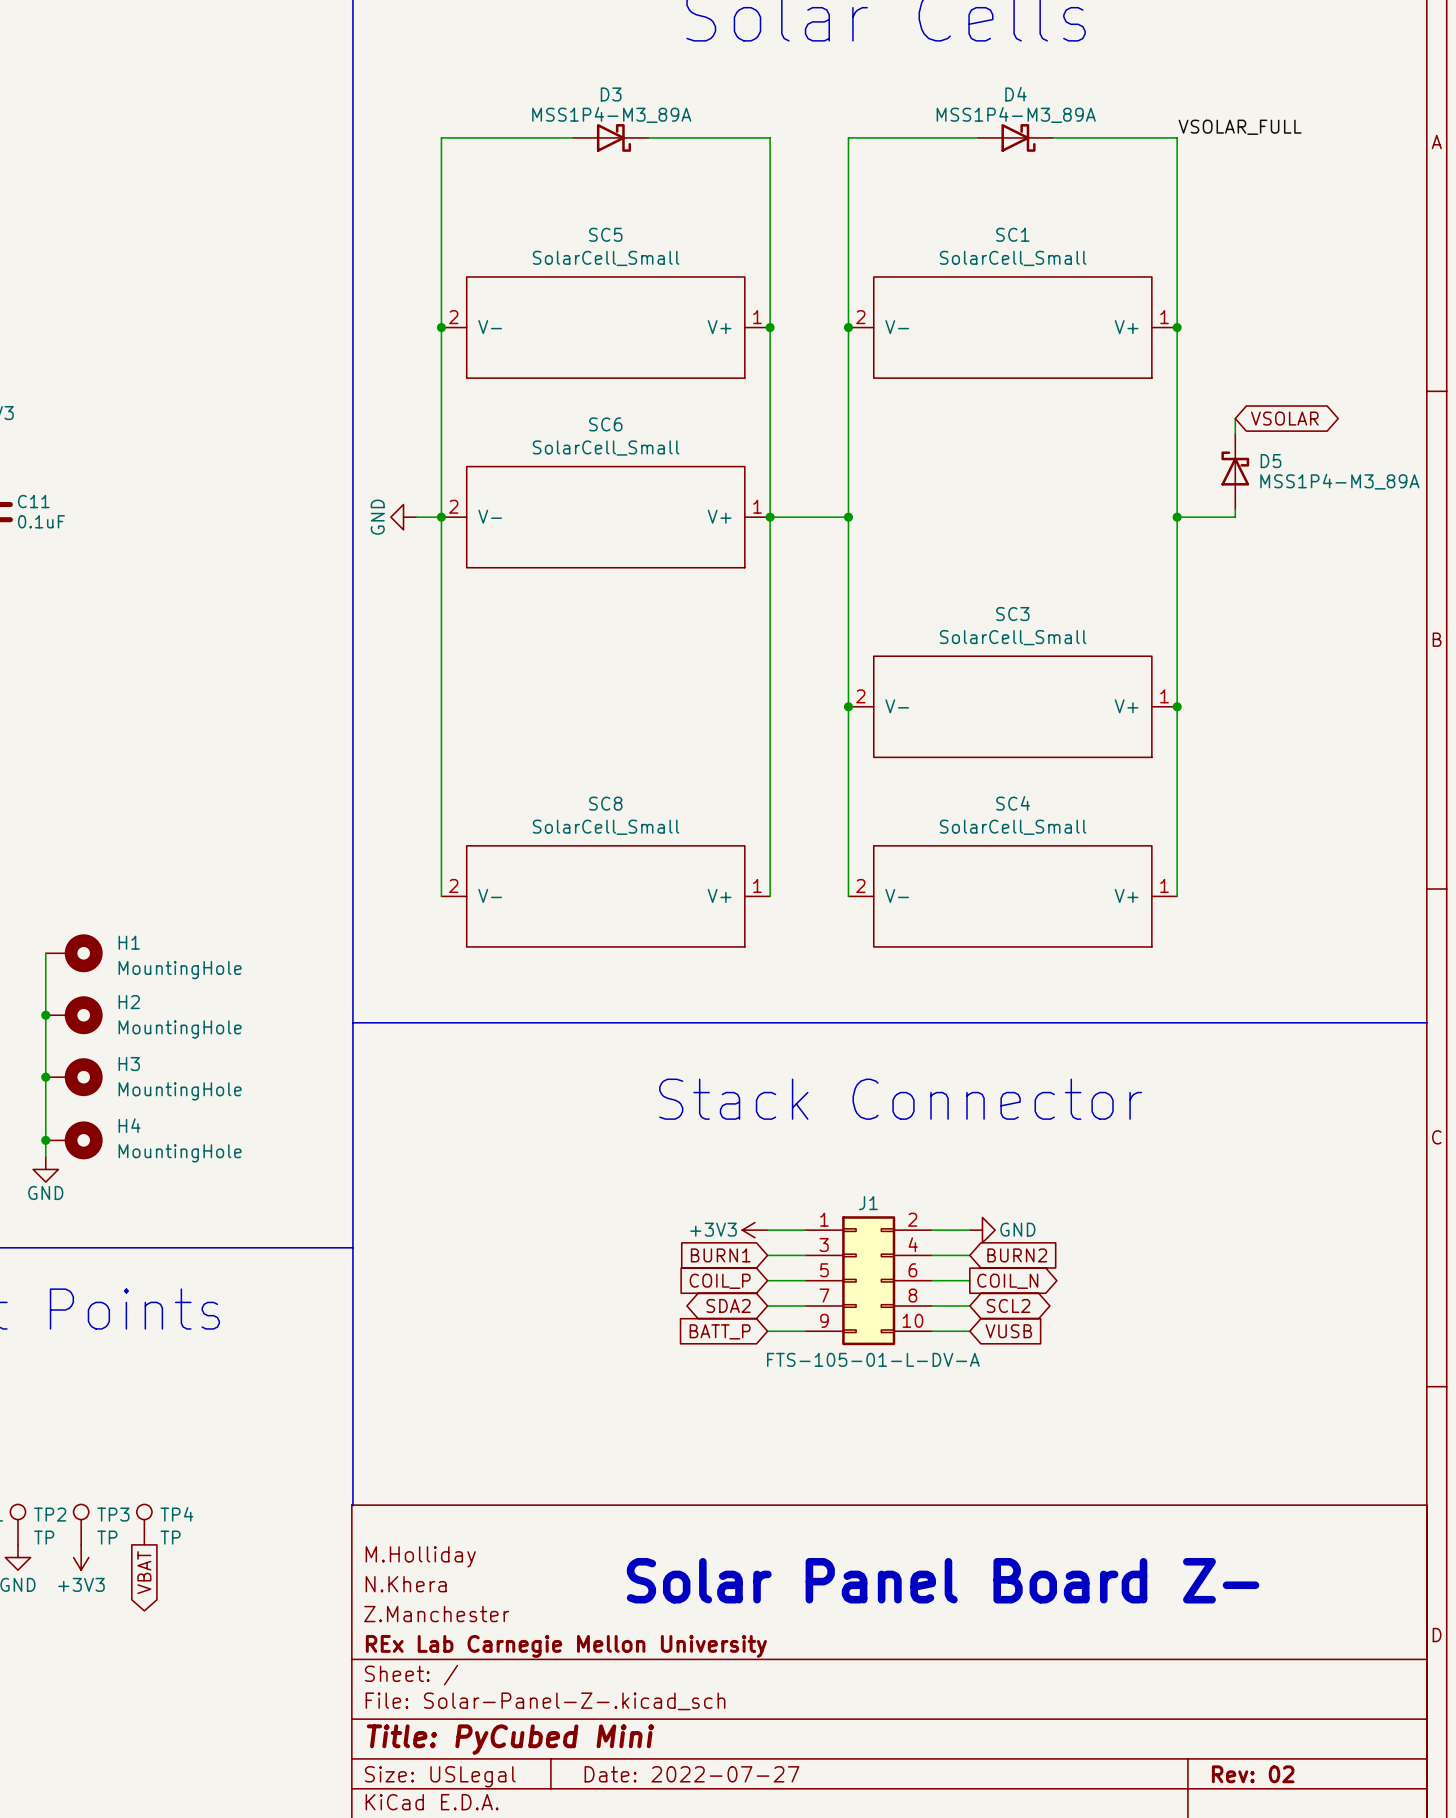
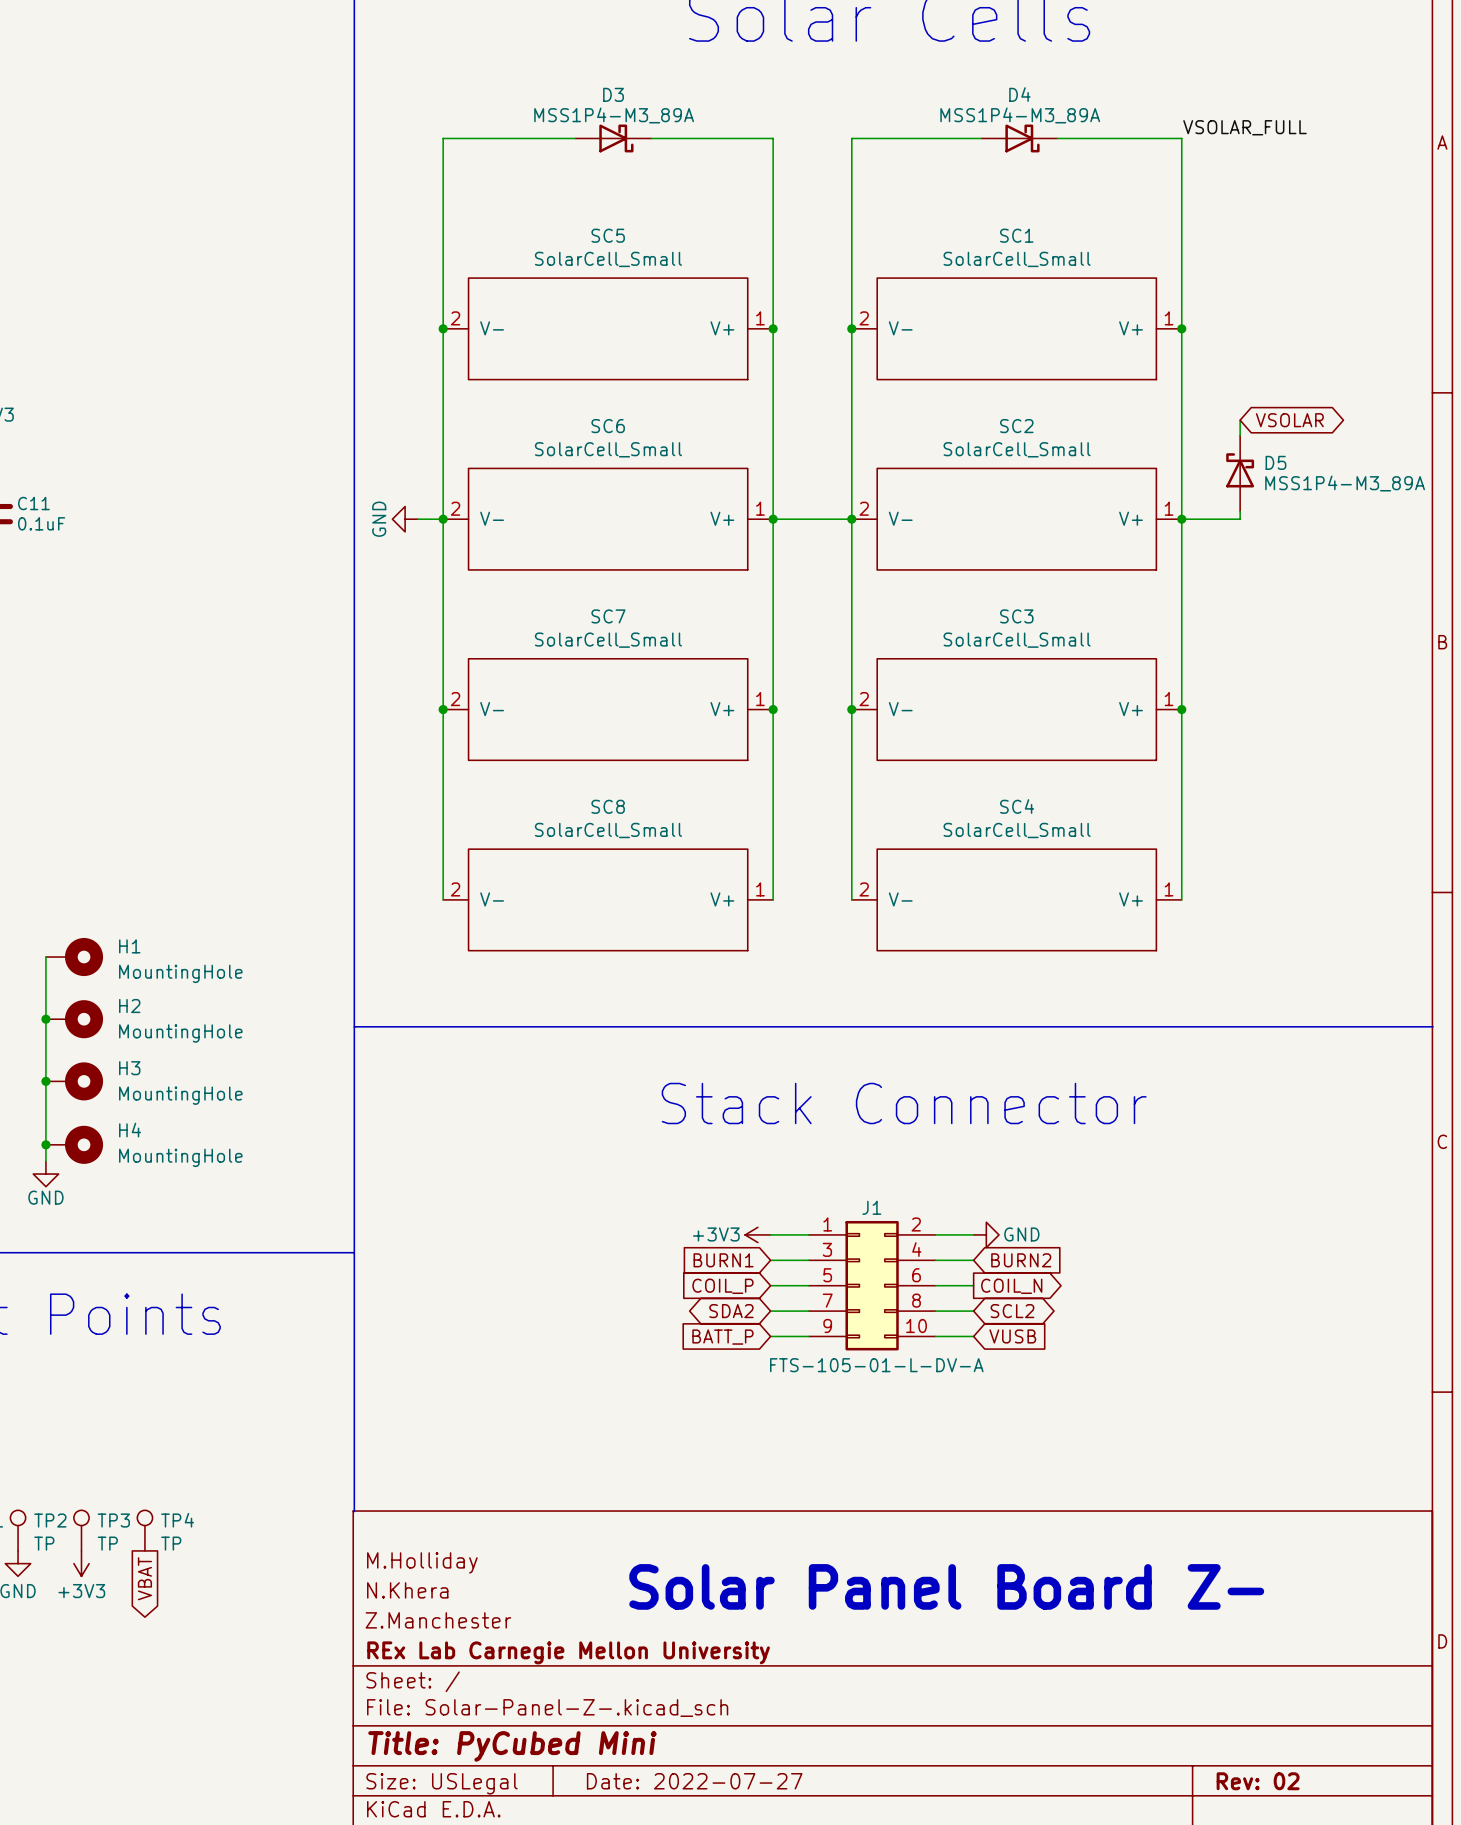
SC2: none -> SolarCell_Small (1016, 519)
junction: none -> (443, 709)
SC7: none -> SolarCell_Small (608, 709)
junction: none -> (773, 709)

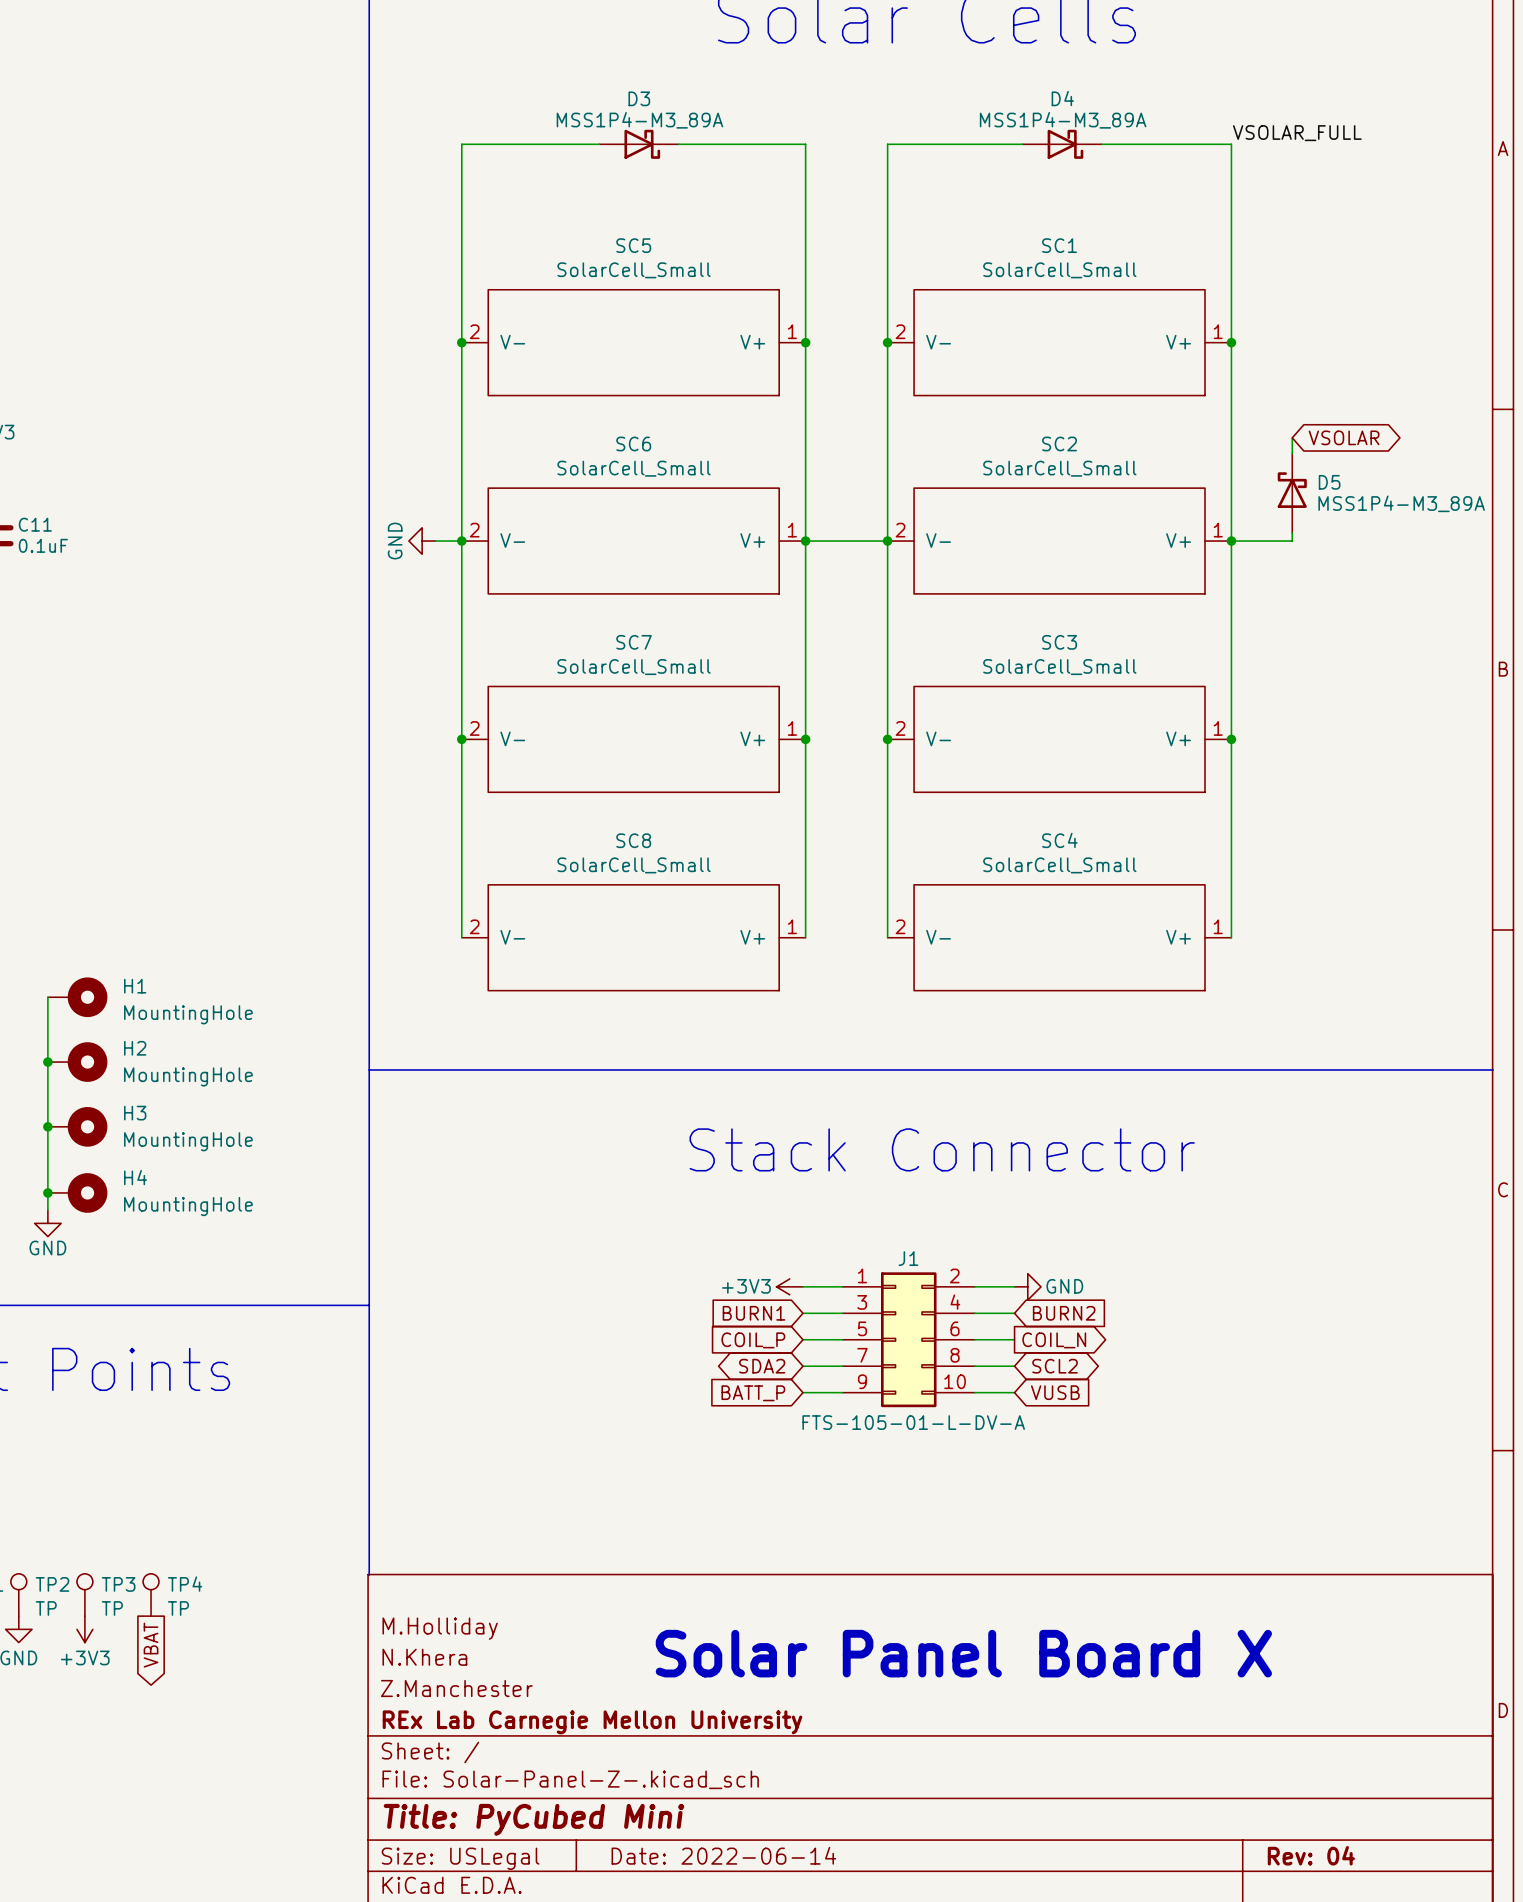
text: Solar Panel Board Z- (946, 1586) -> Solar Panel Board X (963, 1653)
title block: Date: 2022-07-27 (694, 1781) -> Date: 2022-06-14 (723, 1855)
title block: Rev: 02 (1258, 1781) -> Rev: 04 (1311, 1855)

